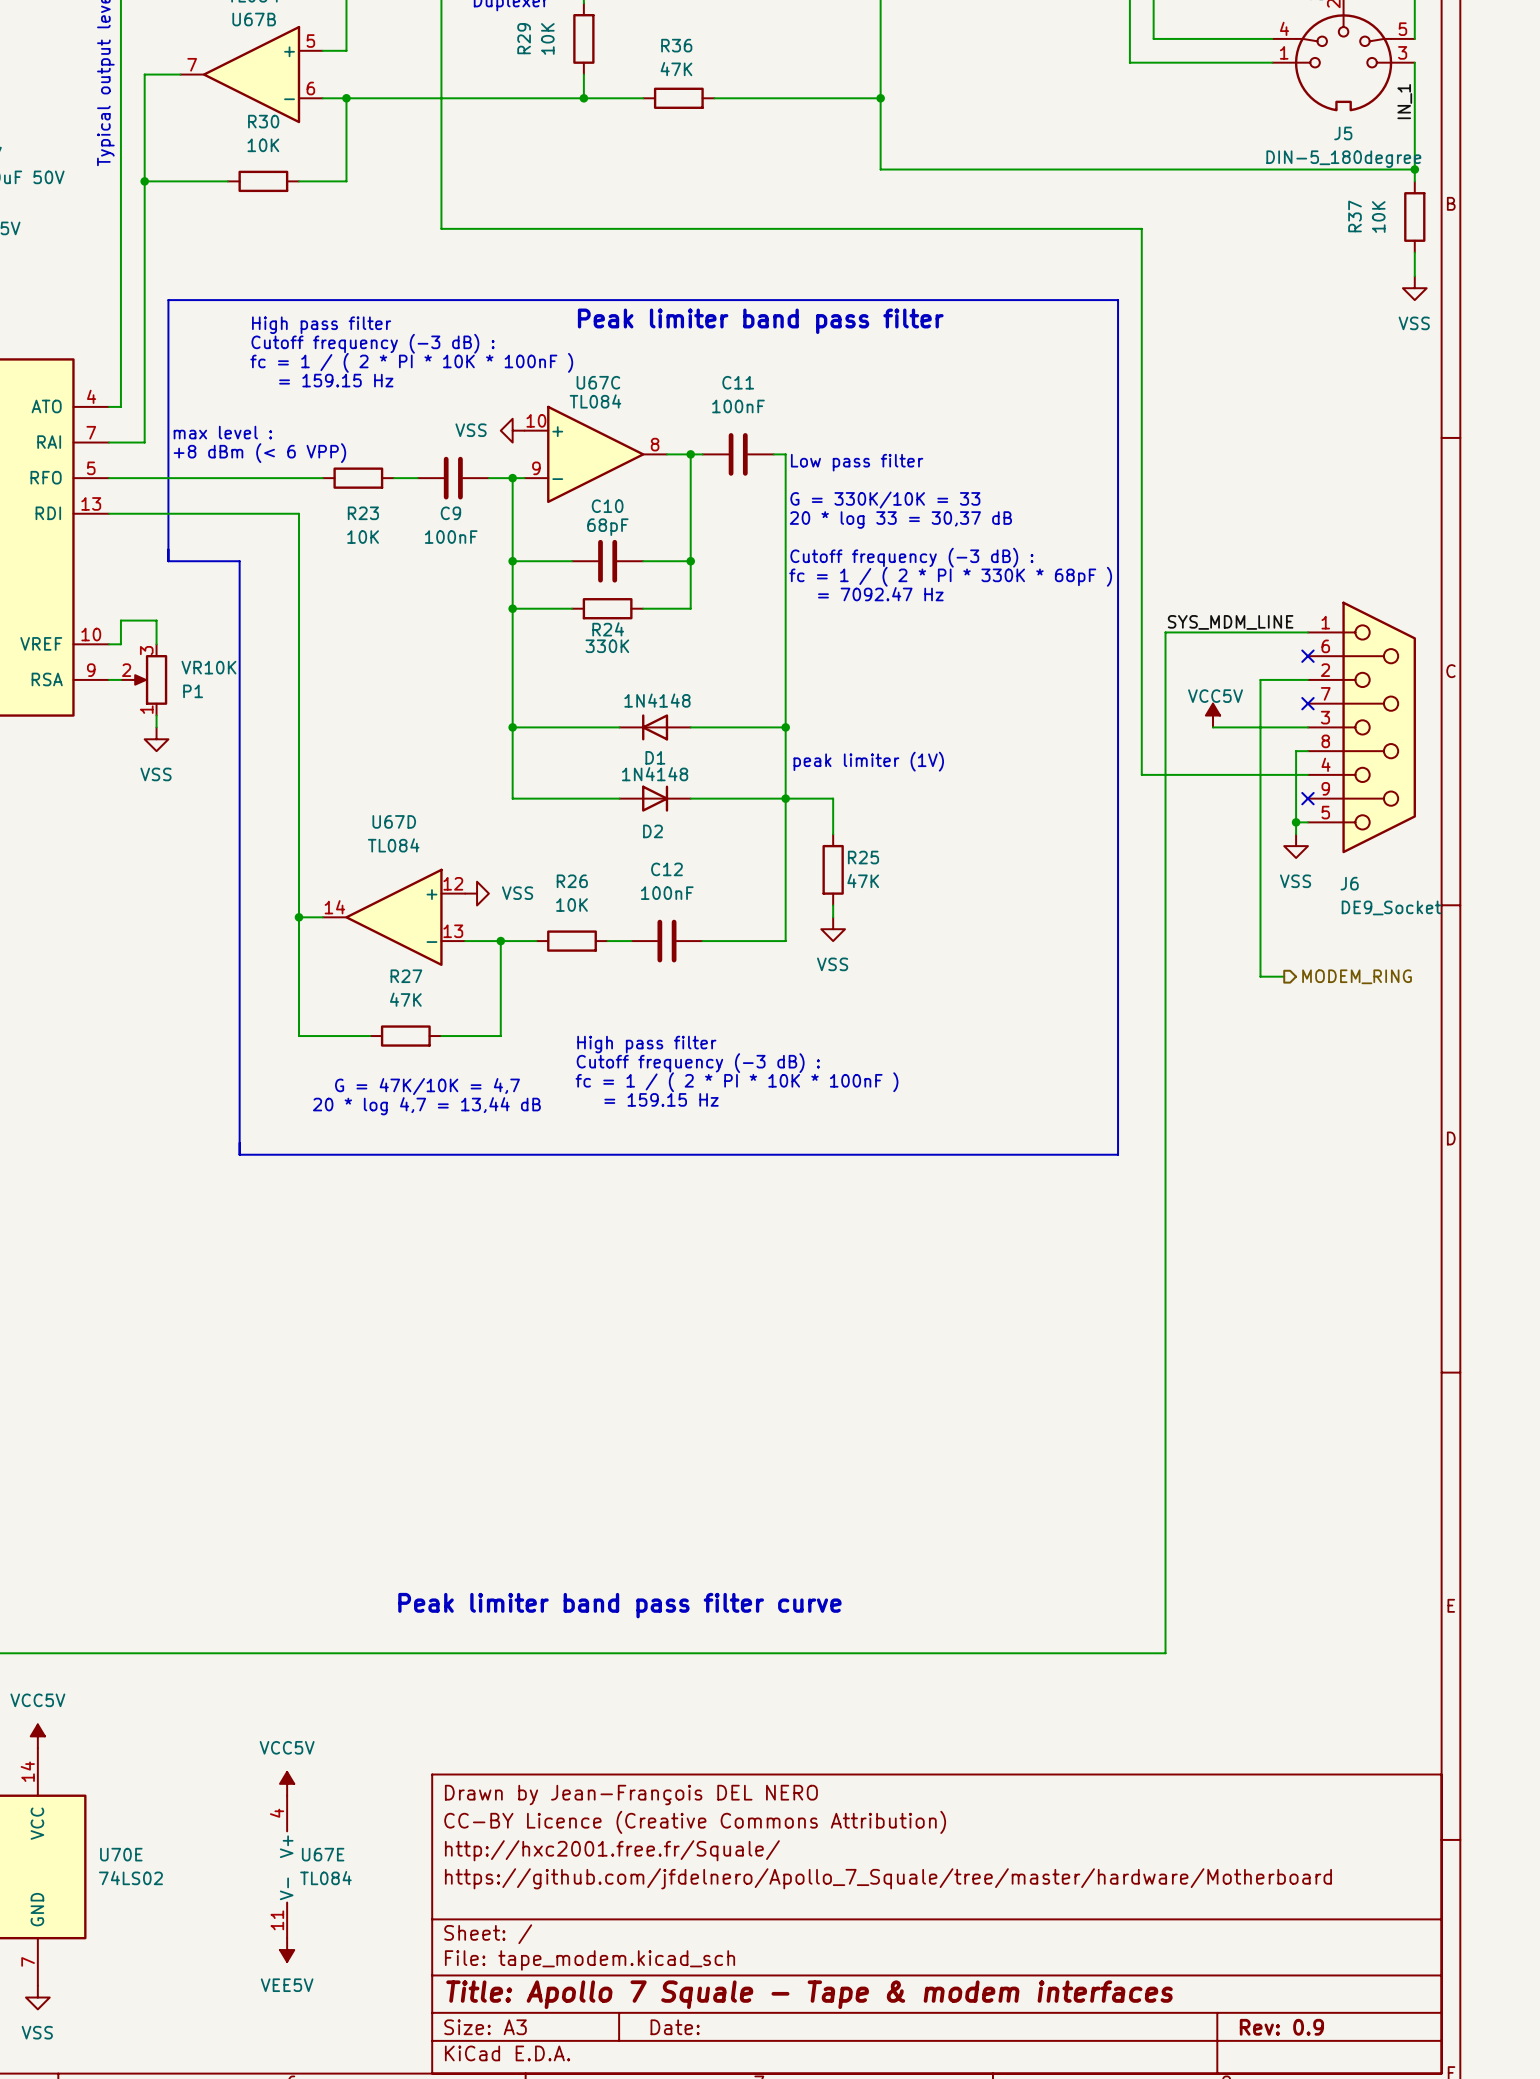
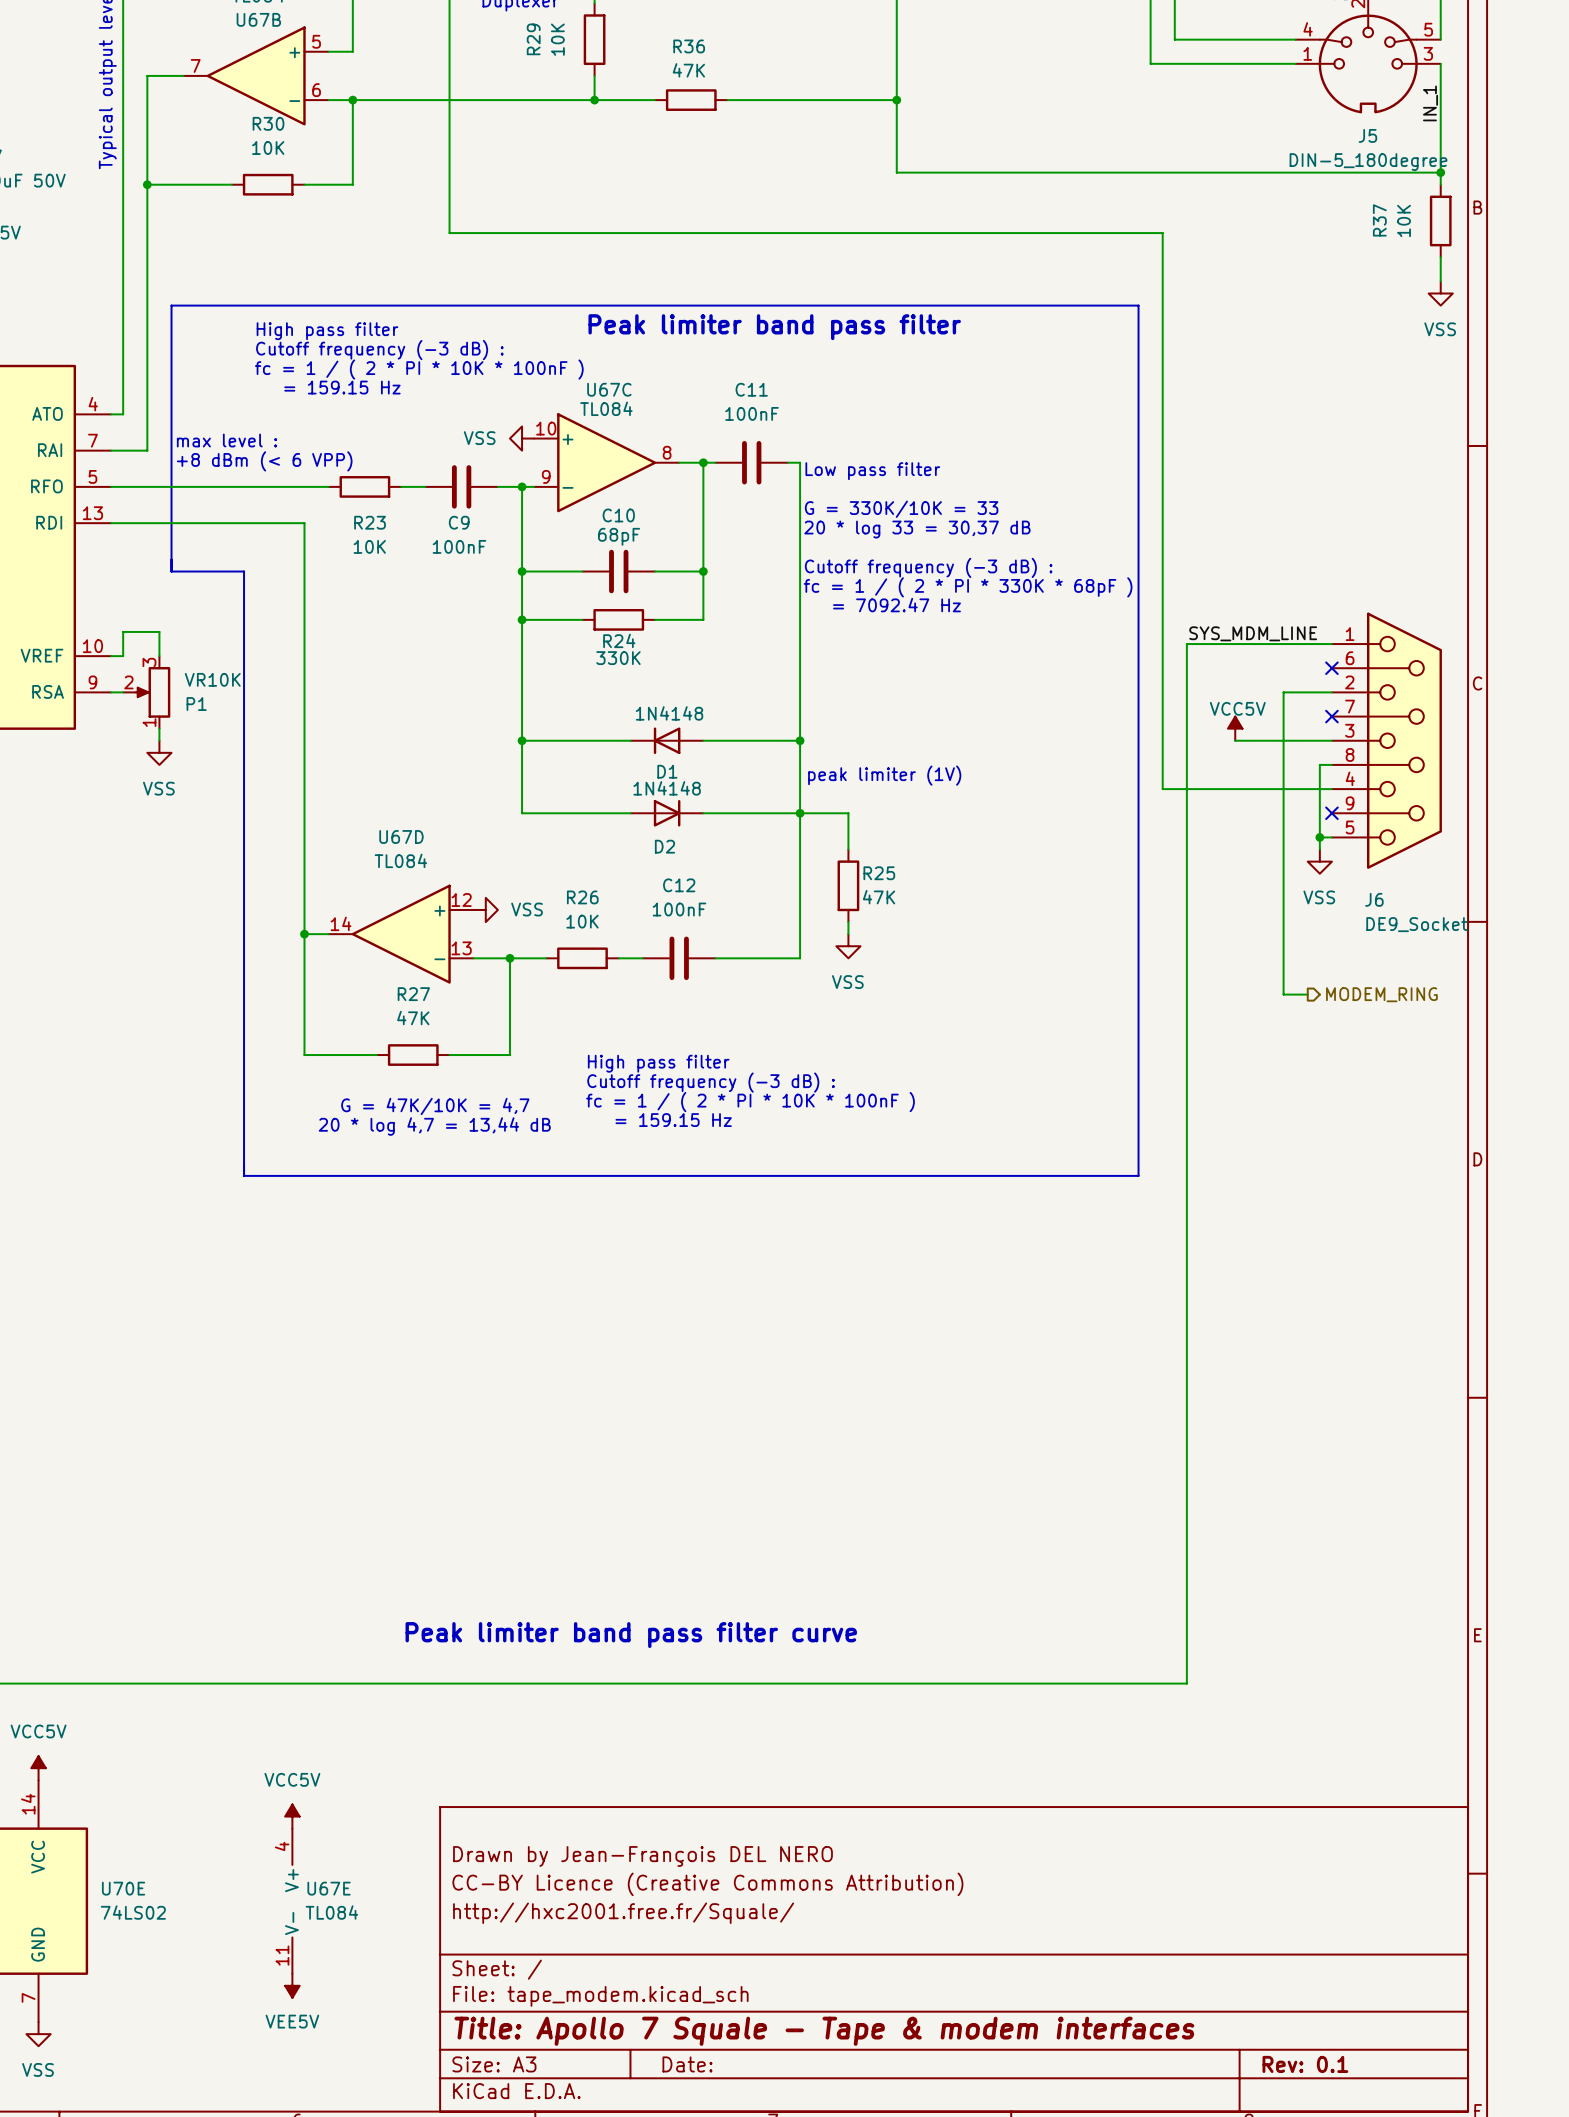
title block: Drawn by Jean-François DEL NERO (631, 1795) -> none
title block: CC-BY Licence (Creative Commons Attribution) (695, 1822) -> Drawn by Jean-François DEL NERO (642, 1856)
title block: http://hxc2001.free.fr/Squale/ (612, 1850) -> CC-BY Licence (Creative Commons Attribution) (707, 1884)
title block: https://github.com/jfdelnero/Apollo_7_Squale/tree/master/hardware/Motherboard (888, 1878) -> http://hxc2001.free.fr/Squale/ (623, 1913)
title block: Rev: 0.9 (1281, 2027) -> Rev: 0.1 (1305, 2064)

